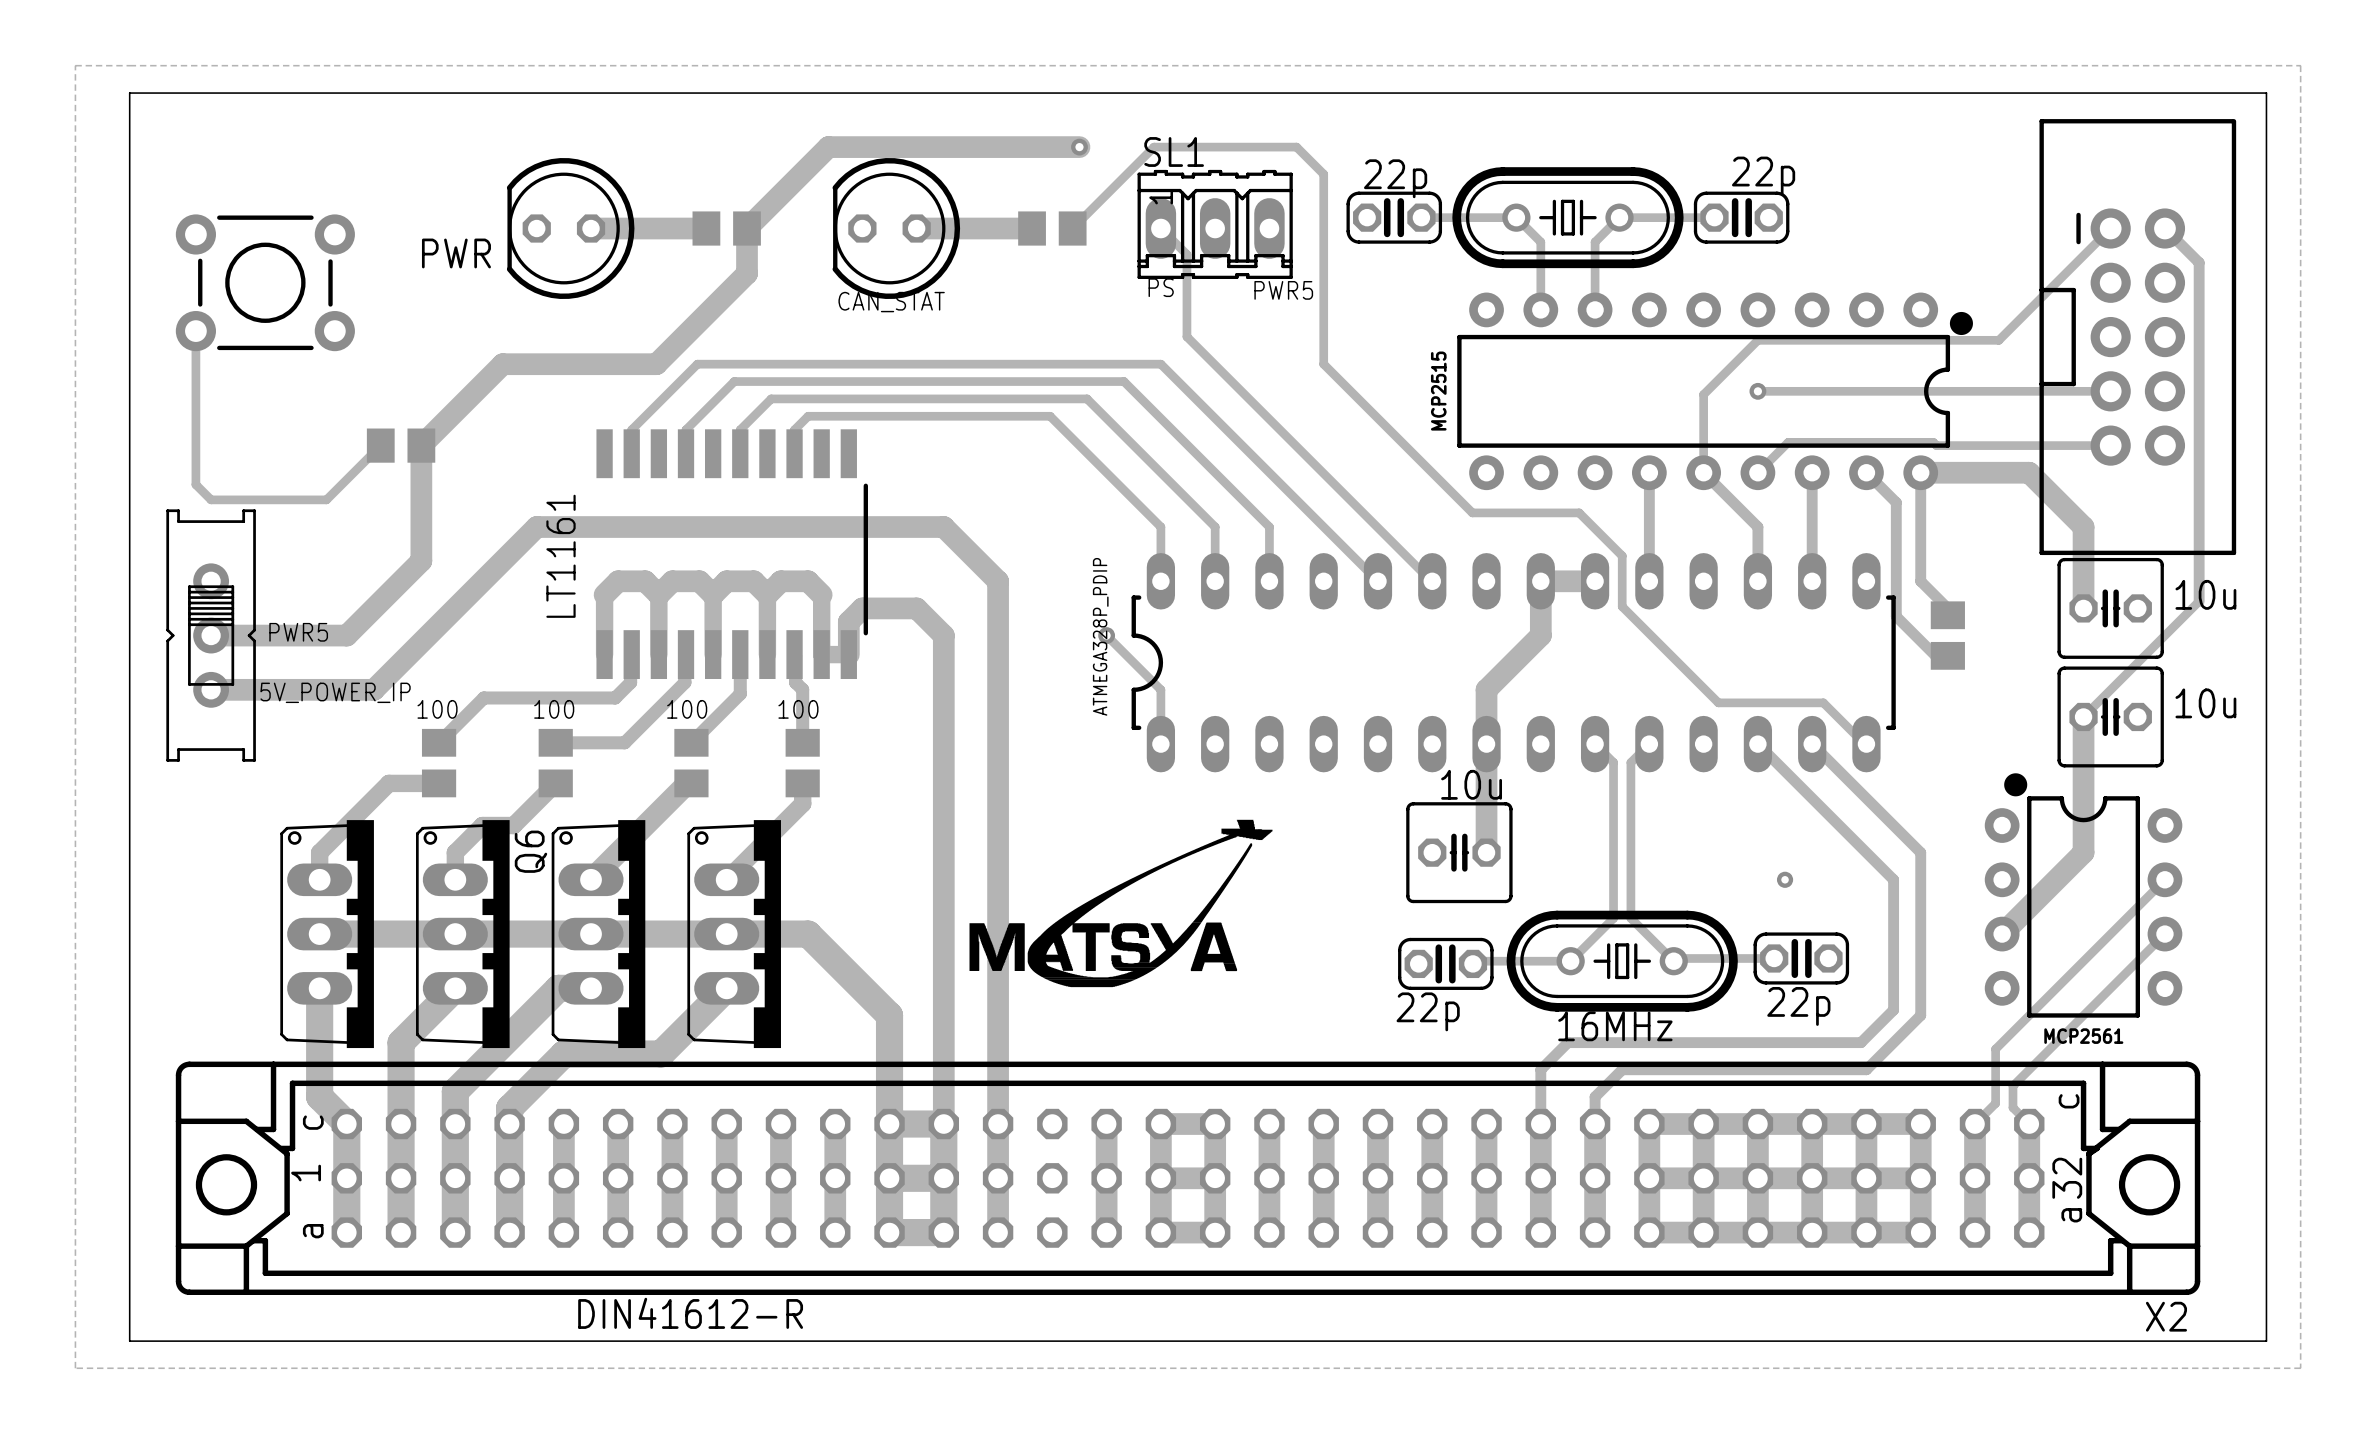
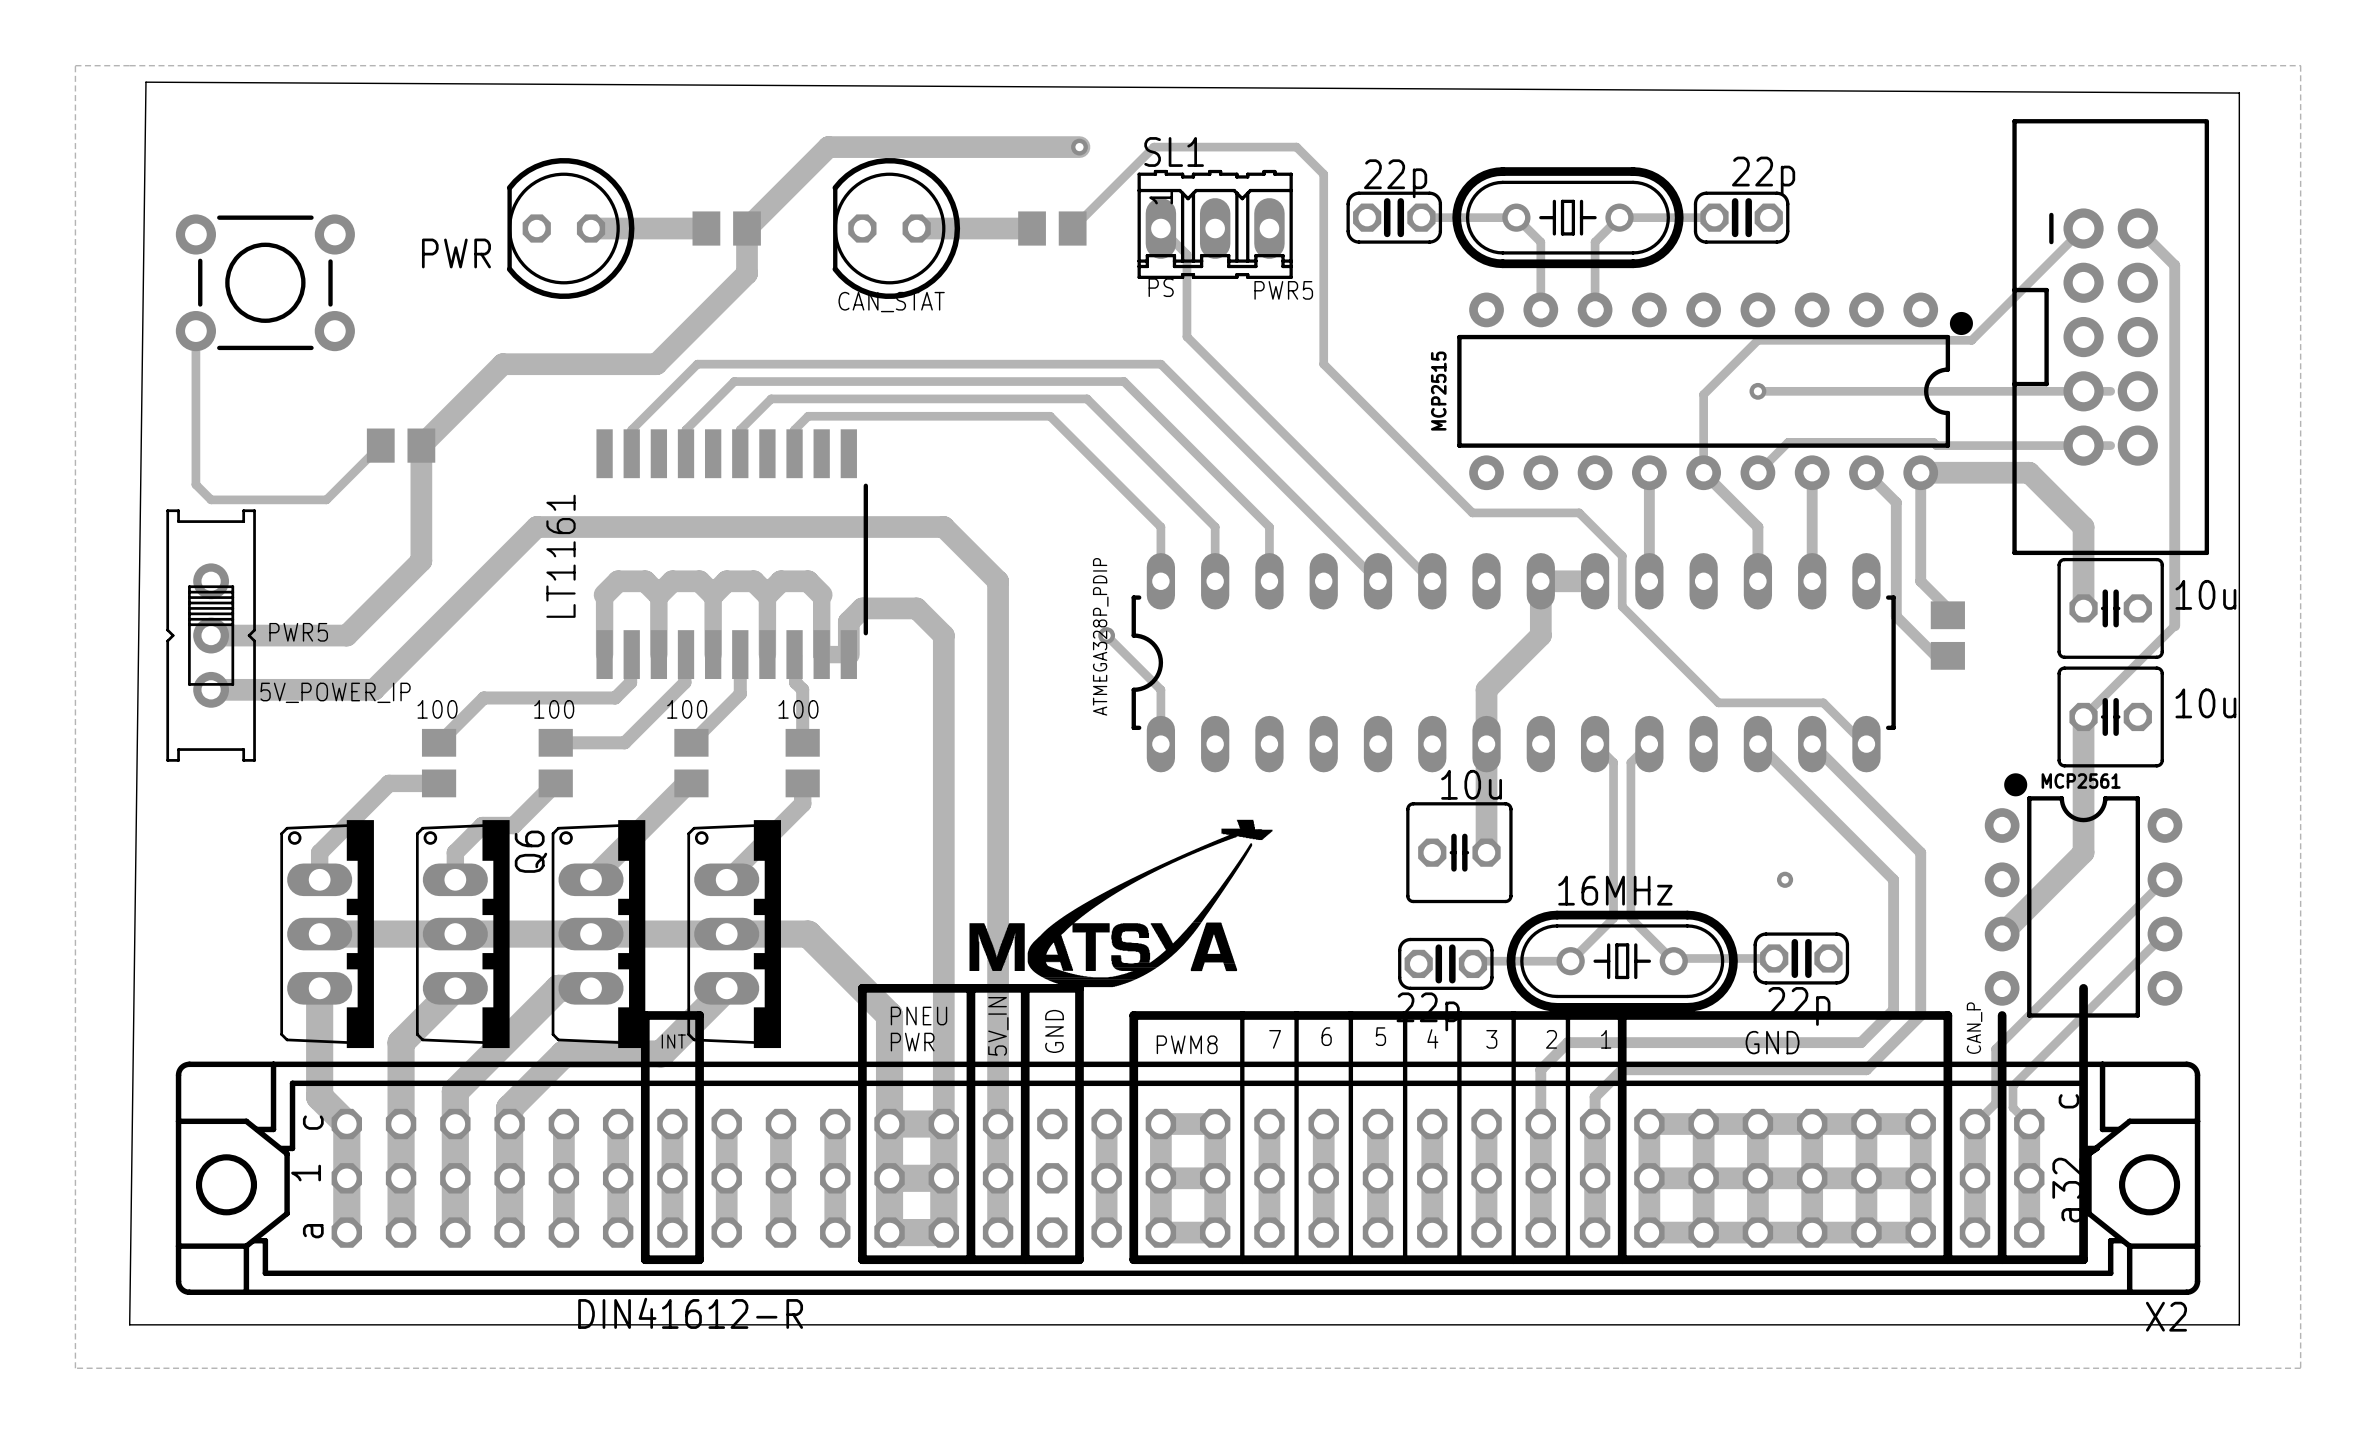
board edge: (129, 93) (2266, 93) (2266, 1341) (129, 1341) (129, 93) -> (145, 82) (129, 1324) (2239, 1324) (2239, 93) (145, 82)
track: (2110, 228) (1998, 340) (1971, 340) -> (2083, 228) (1971, 340)
track: (2164, 228) (2199, 262) (2199, 601) (2174, 625) -> (2137, 228) (2174, 265) (2174, 625)
part position: (2137, 337) -> (2110, 337)
line: none -> (862, 988) (862, 1259) (1079, 1259) (1079, 988) (862, 988)
line: none -> (970, 988) (970, 1259)
line: none -> (1025, 988) (1025, 1259)
line: none -> (2083, 988) (2083, 1259) (1133, 1259) (1133, 1015) (1947, 1015) (1947, 1259)
line: none -> (645, 1015) (699, 1015) (699, 1259) (645, 1259) (645, 1015)
line: none -> (1242, 1015) (1242, 1259)
line: none -> (1296, 1015) (1296, 1259)
line: none -> (1350, 1015) (1350, 1259)
line: none -> (1405, 1015) (1405, 1259)
line: none -> (1459, 1015) (1459, 1259)
line: none -> (1513, 1015) (1513, 1259)
line: none -> (1567, 1015) (1567, 1259)
line: none -> (1622, 1015) (1622, 1259)
line: none -> (2002, 1015) (2002, 1259)
text: none -> PNEU (918, 1016)
text: none -> 5V_IN (998, 1026)
part value position: 16MHz (1615, 1026) -> 16MHz (1615, 890)
text: none -> CAN_P (1974, 1028)
text: none -> GND (1054, 1031)
text: none -> 6 (1326, 1036)
text: none -> 5 (1380, 1036)
part value position: MCP2561 (2083, 1036) -> MCP2561 (2081, 781)
text: none -> 4 (1432, 1038)
text: none -> 7 (1275, 1039)
text: none -> 3 (1491, 1039)
text: none -> 2 (1551, 1039)
text: none -> 1 (1606, 1039)
text: none -> INT (673, 1041)
text: none -> PWR (912, 1042)
text: none -> GND (1772, 1042)
text: none -> PWM8 (1187, 1044)

